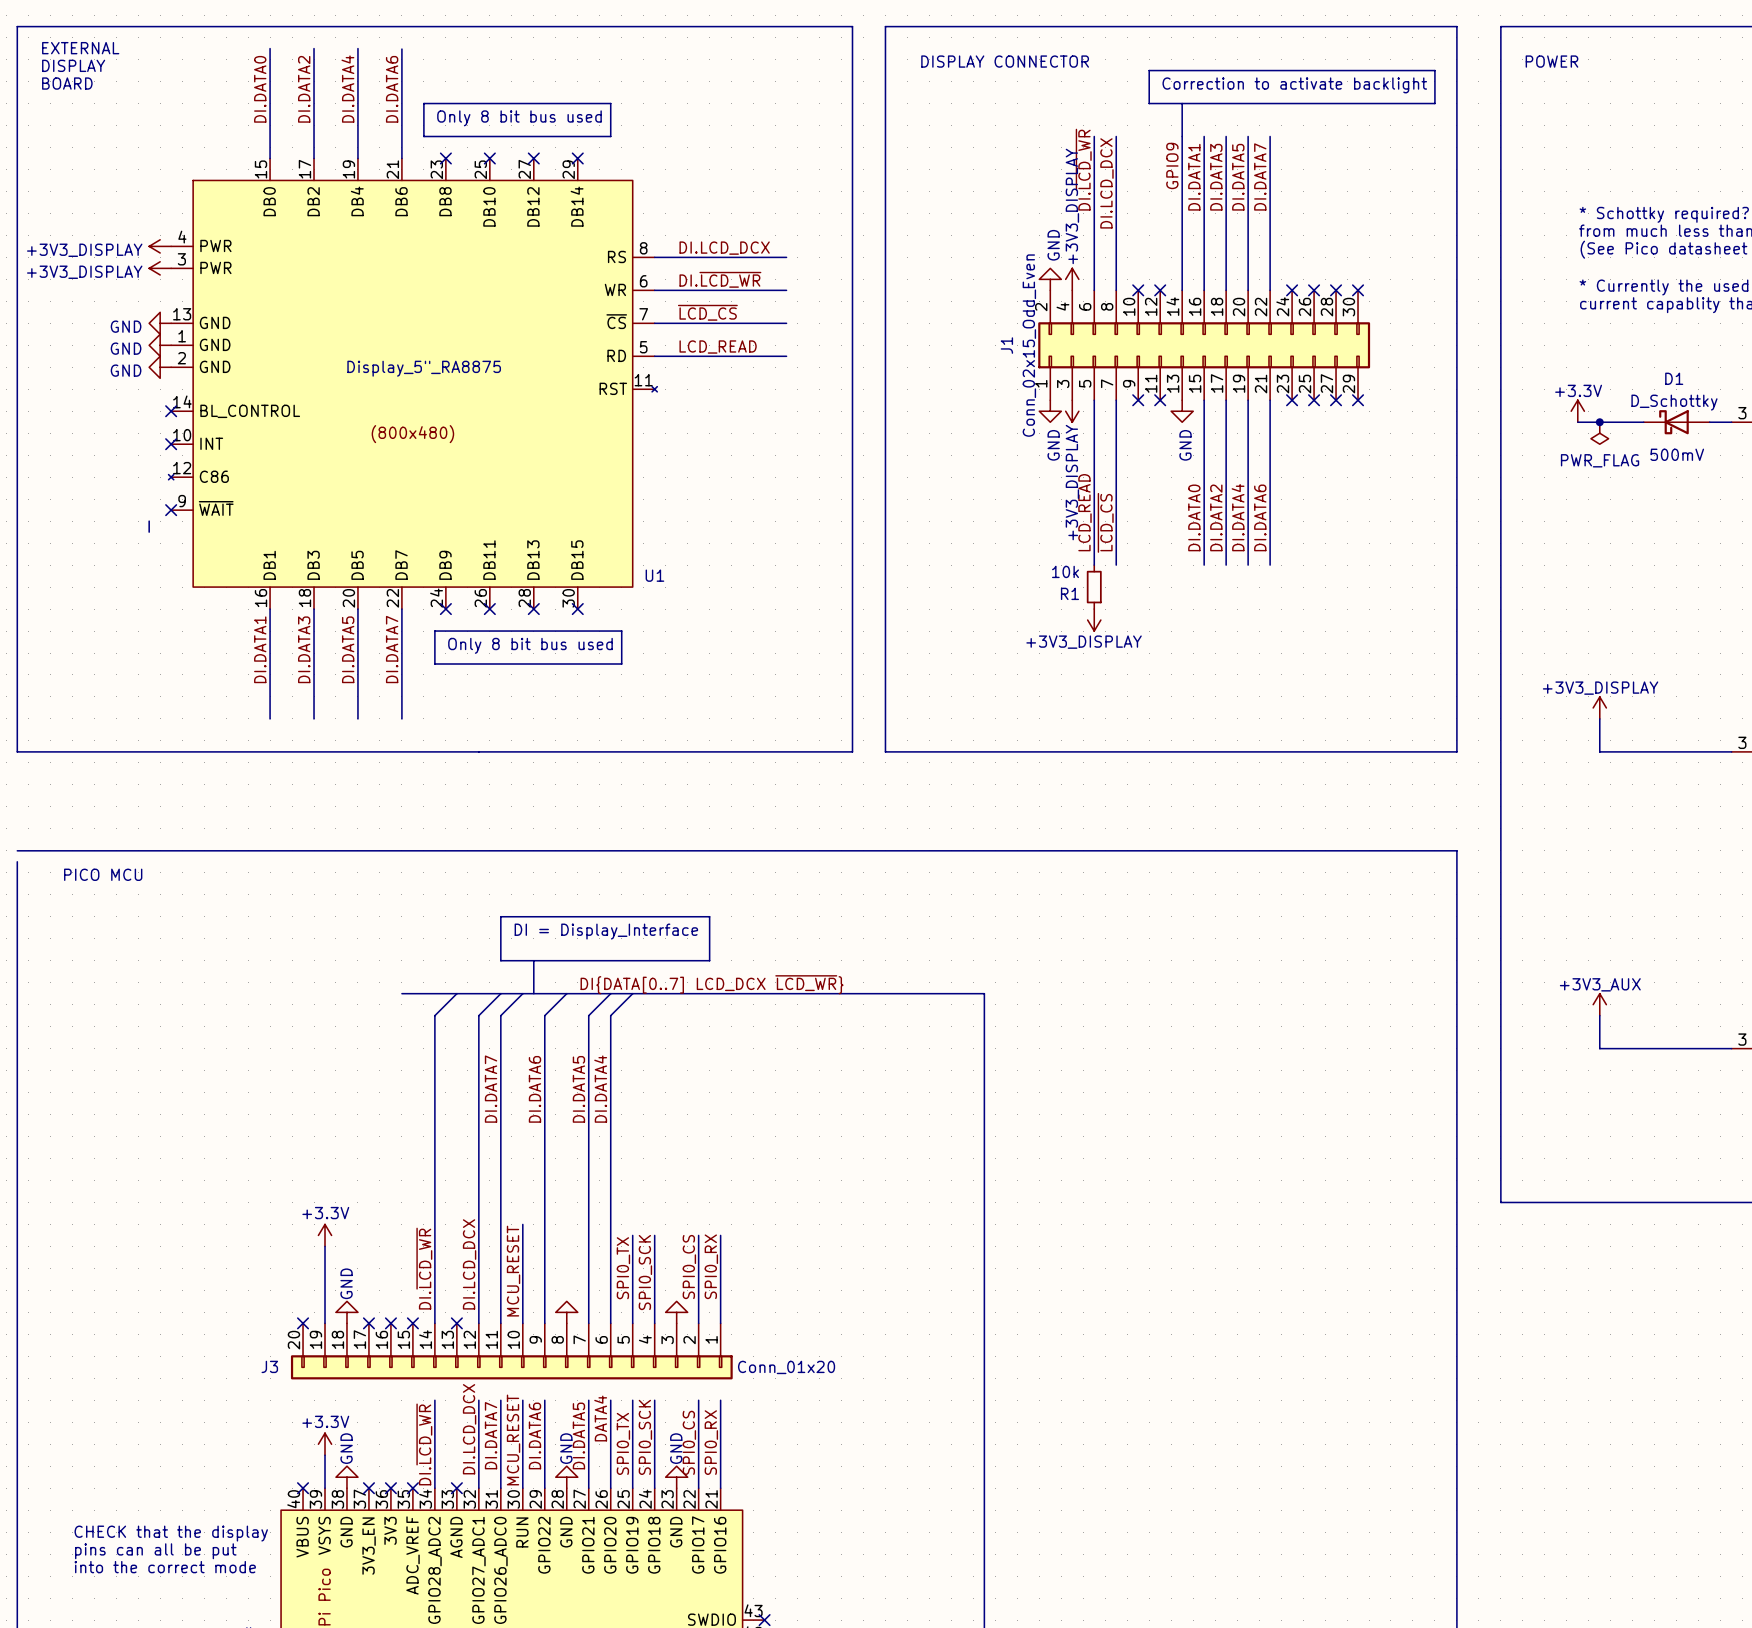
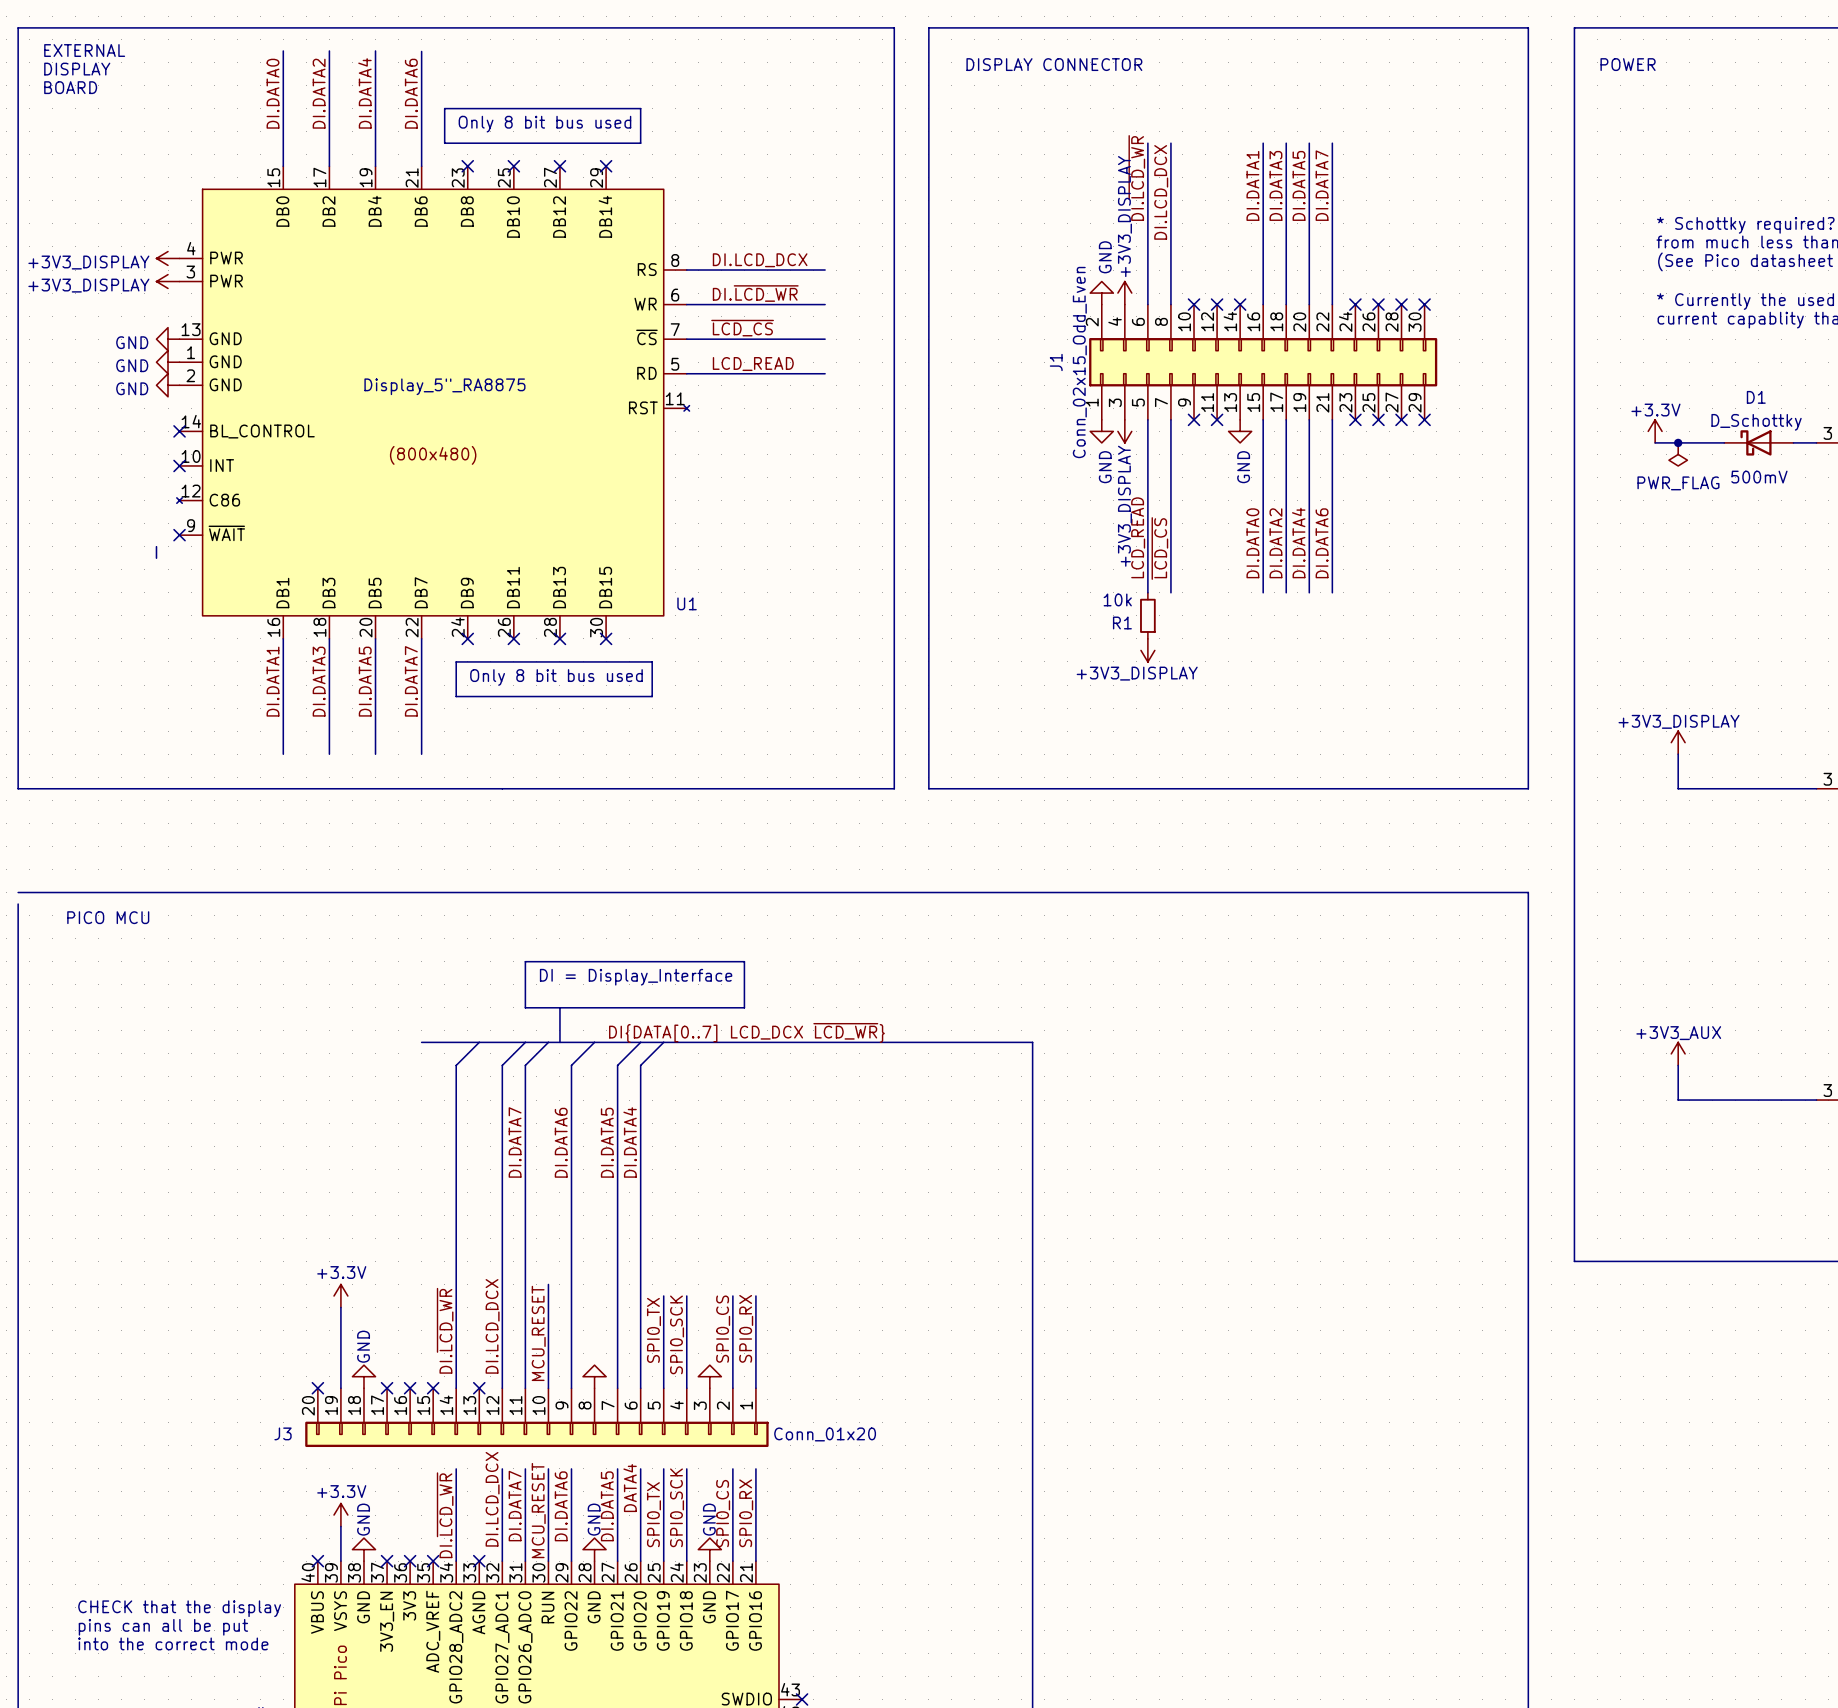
line: (1149, 70) (1434, 70) (1434, 103) (1149, 103) (1149, 70) -> none
text: Correction to activate backlight (1294, 85) -> none
line: (1182, 103) (1182, 136) -> none
wire: (1182, 136) (1182, 290) -> none
label: GPIO9 (1172, 165) -> none
no-connect mark: none -> (1240, 304)

